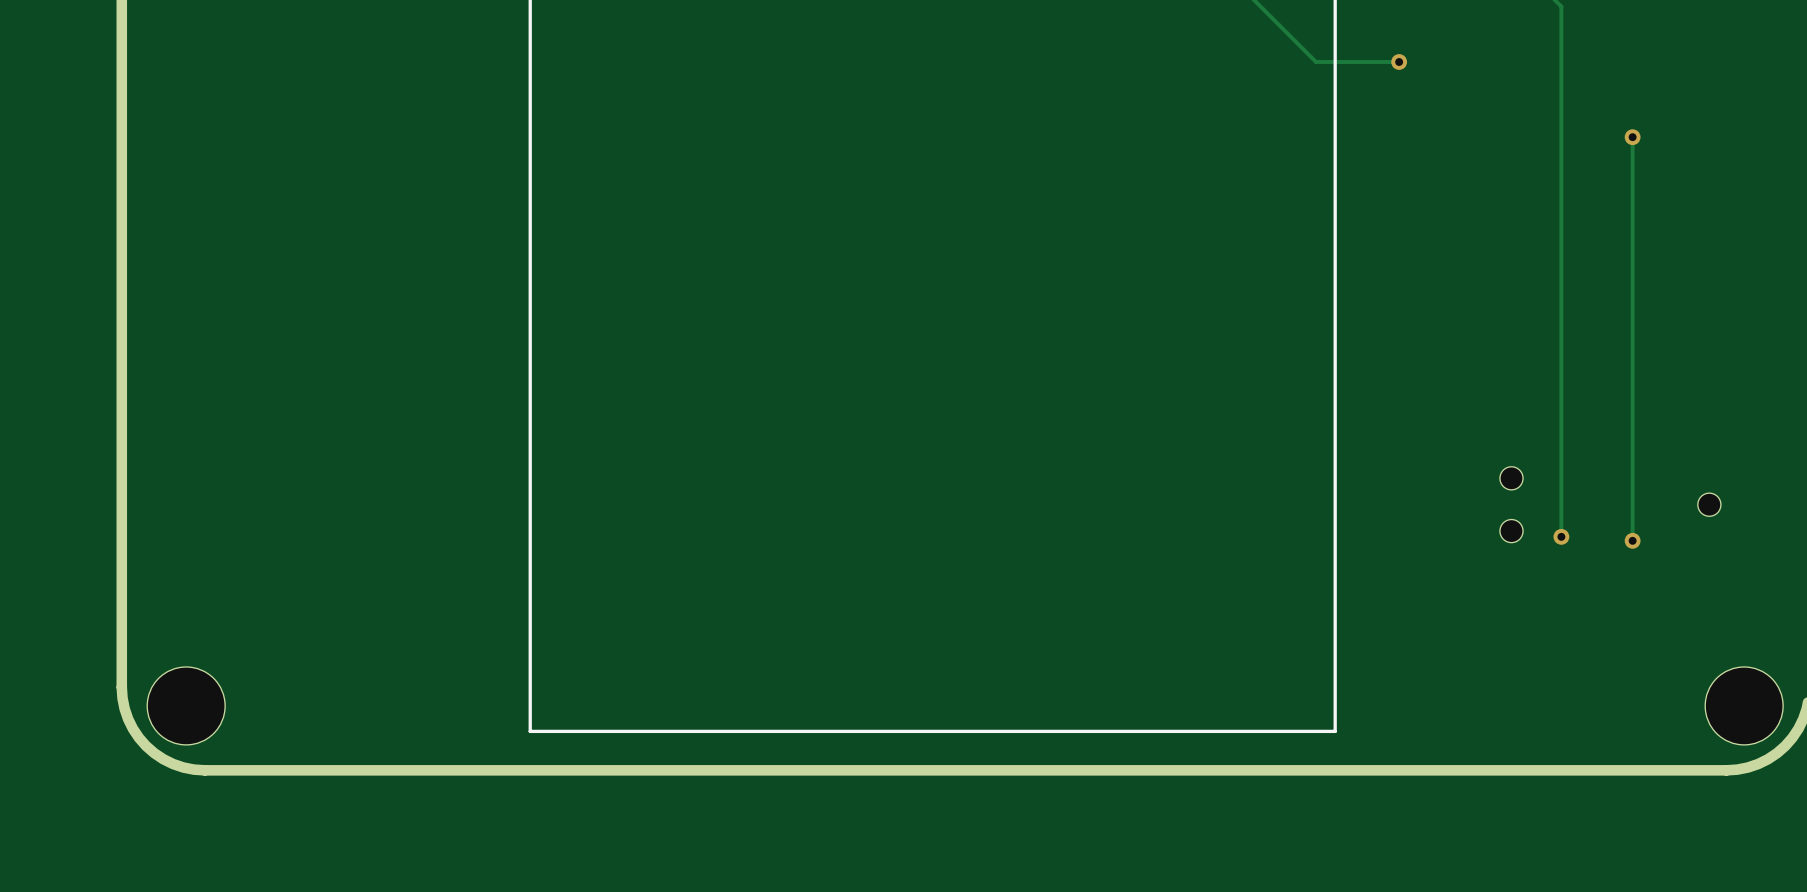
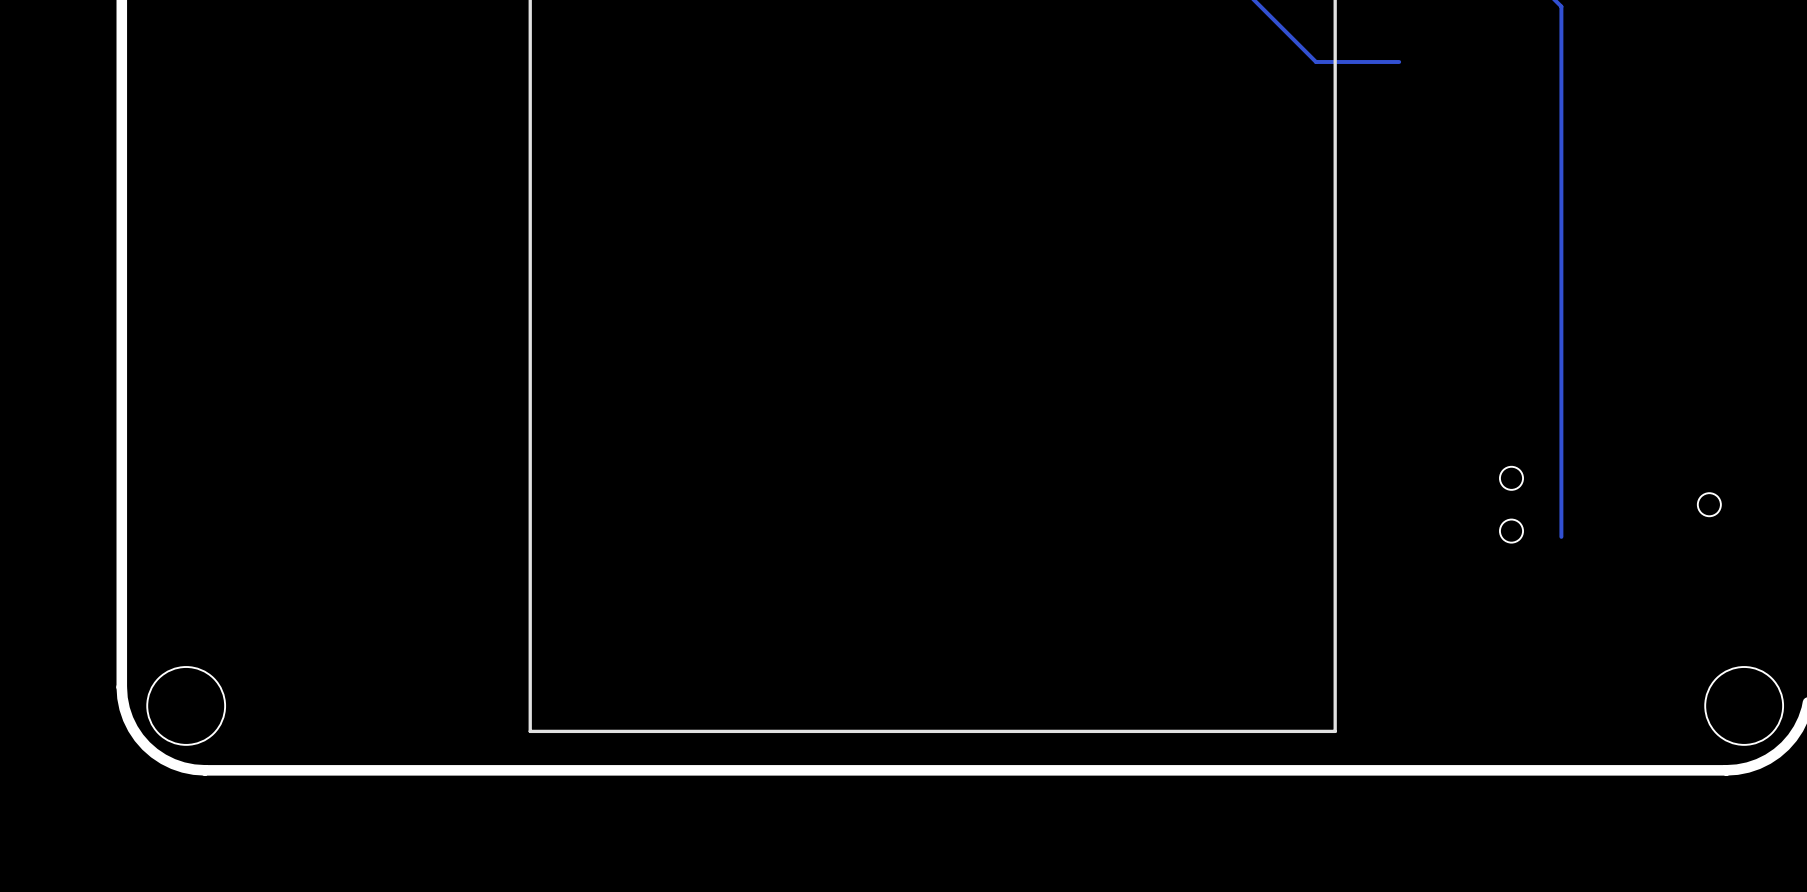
via: (1399, 61) -> none
track: (1632, 137) (1632, 540) -> none
via: (1632, 137) -> none
via: (1561, 536) -> none
via: (1632, 540) -> none

